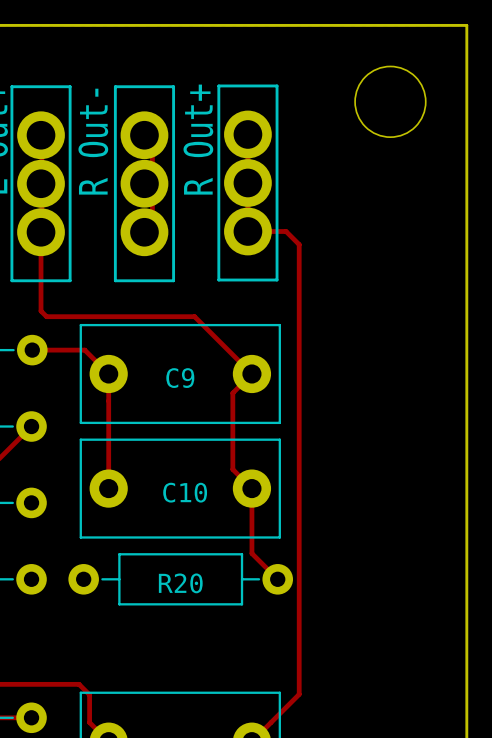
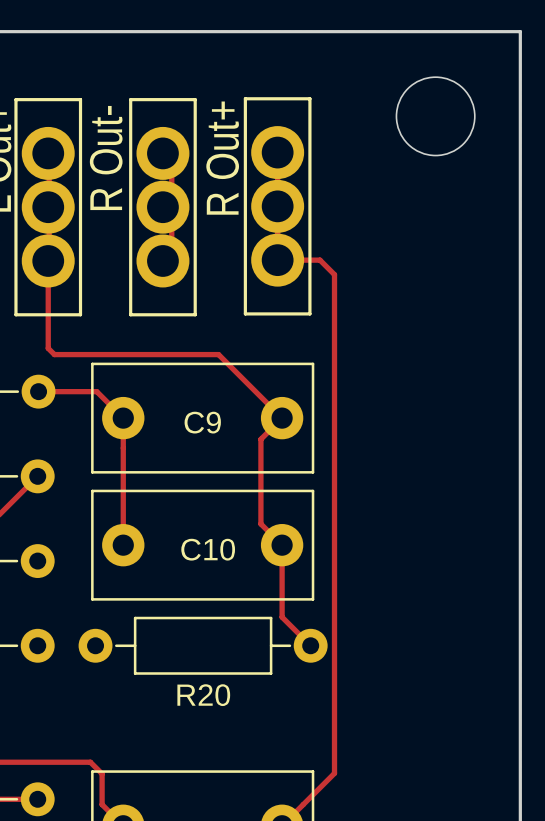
R20 name position: R20 (180, 583) -> R20 (203, 695)

